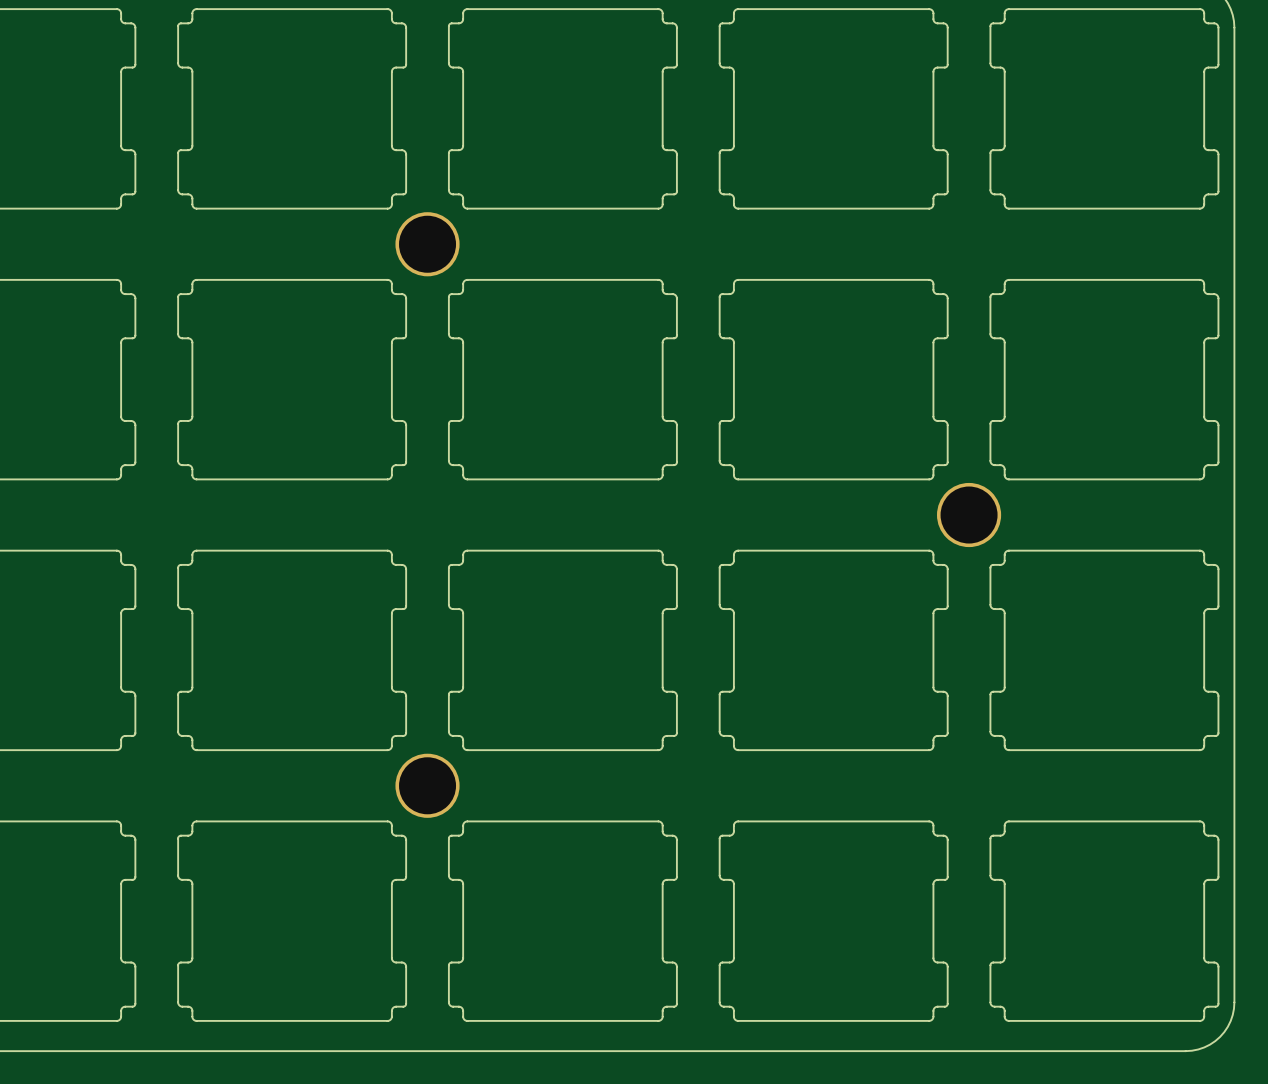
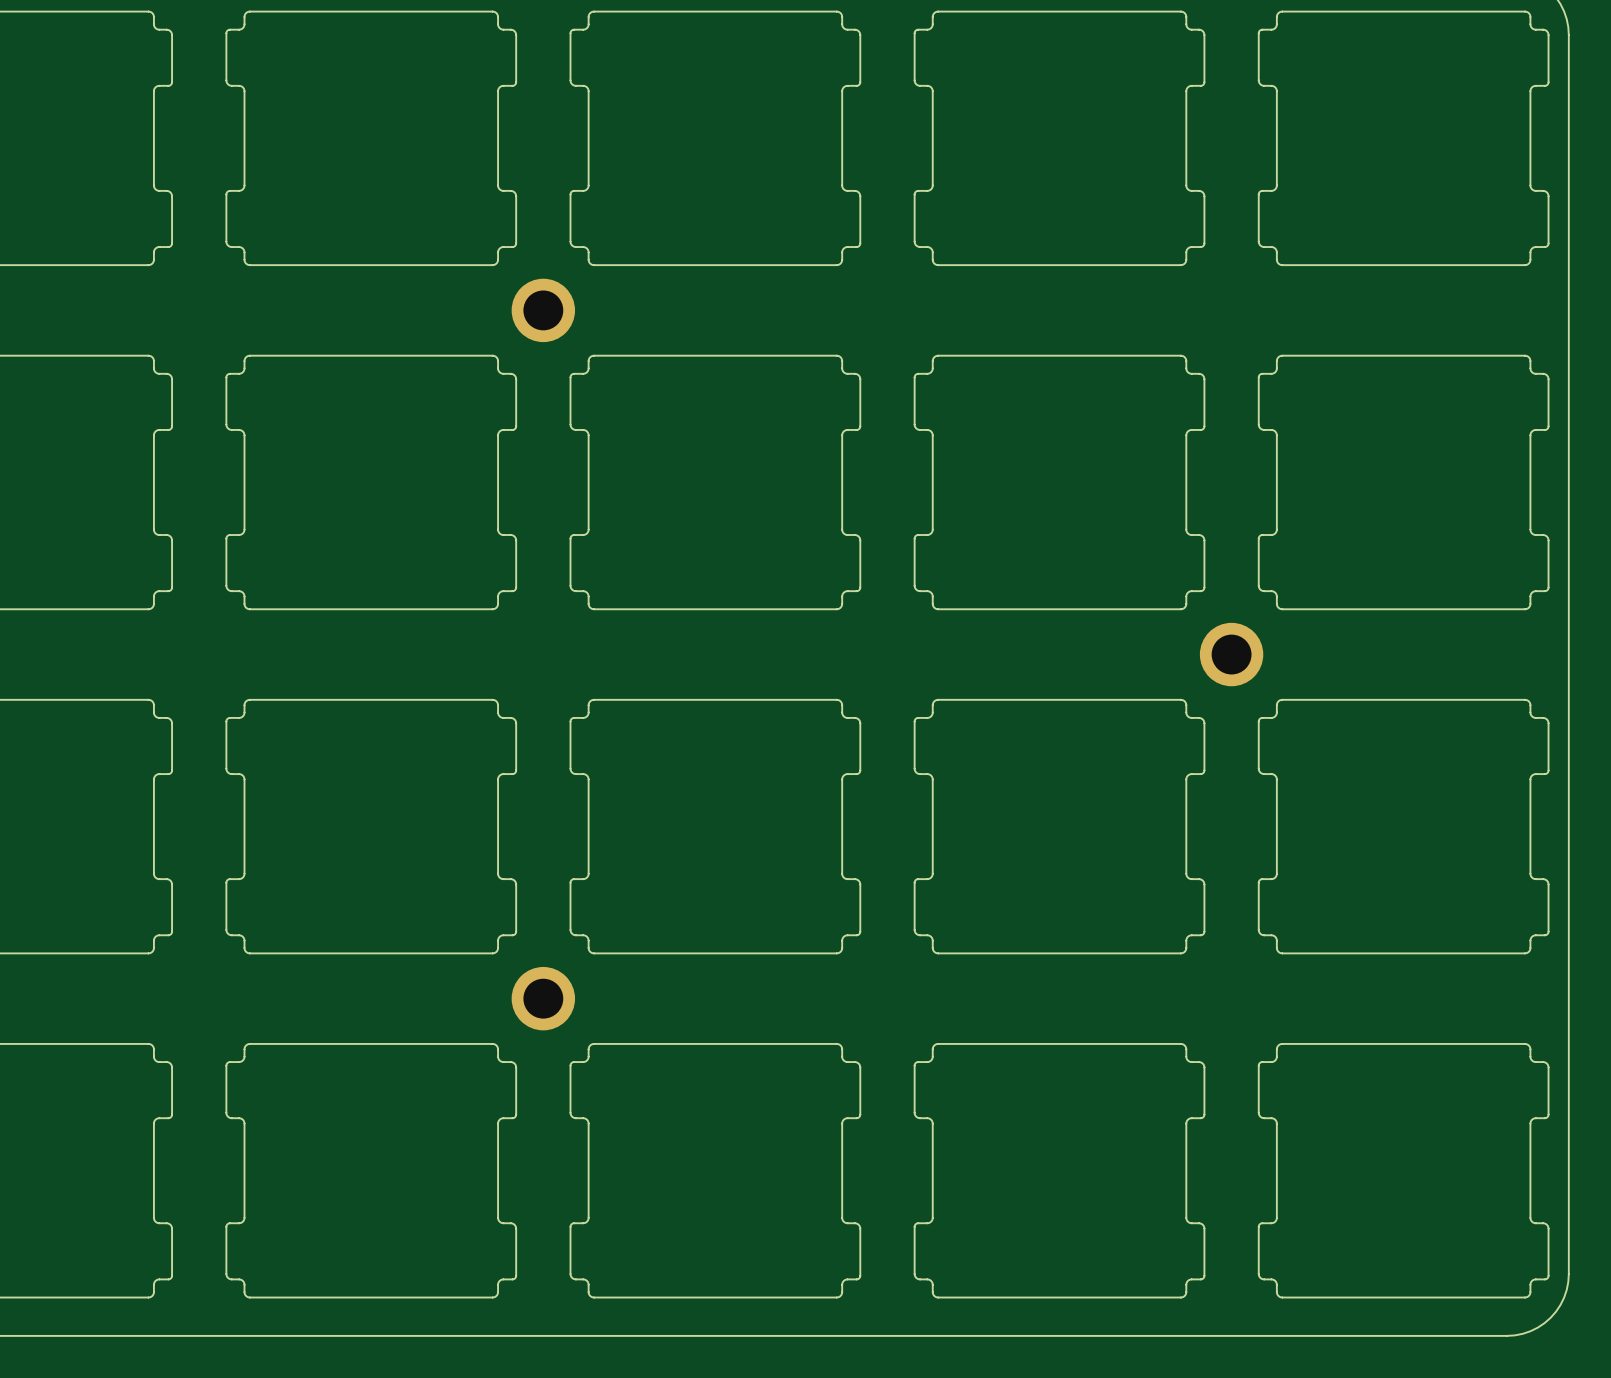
part footprint: [395, 212, 460, 277] -> [511, 278, 576, 343]
part footprint: [936, 482, 1002, 548] -> [1199, 622, 1264, 687]
part footprint: [395, 753, 460, 818] -> [511, 966, 576, 1031]

